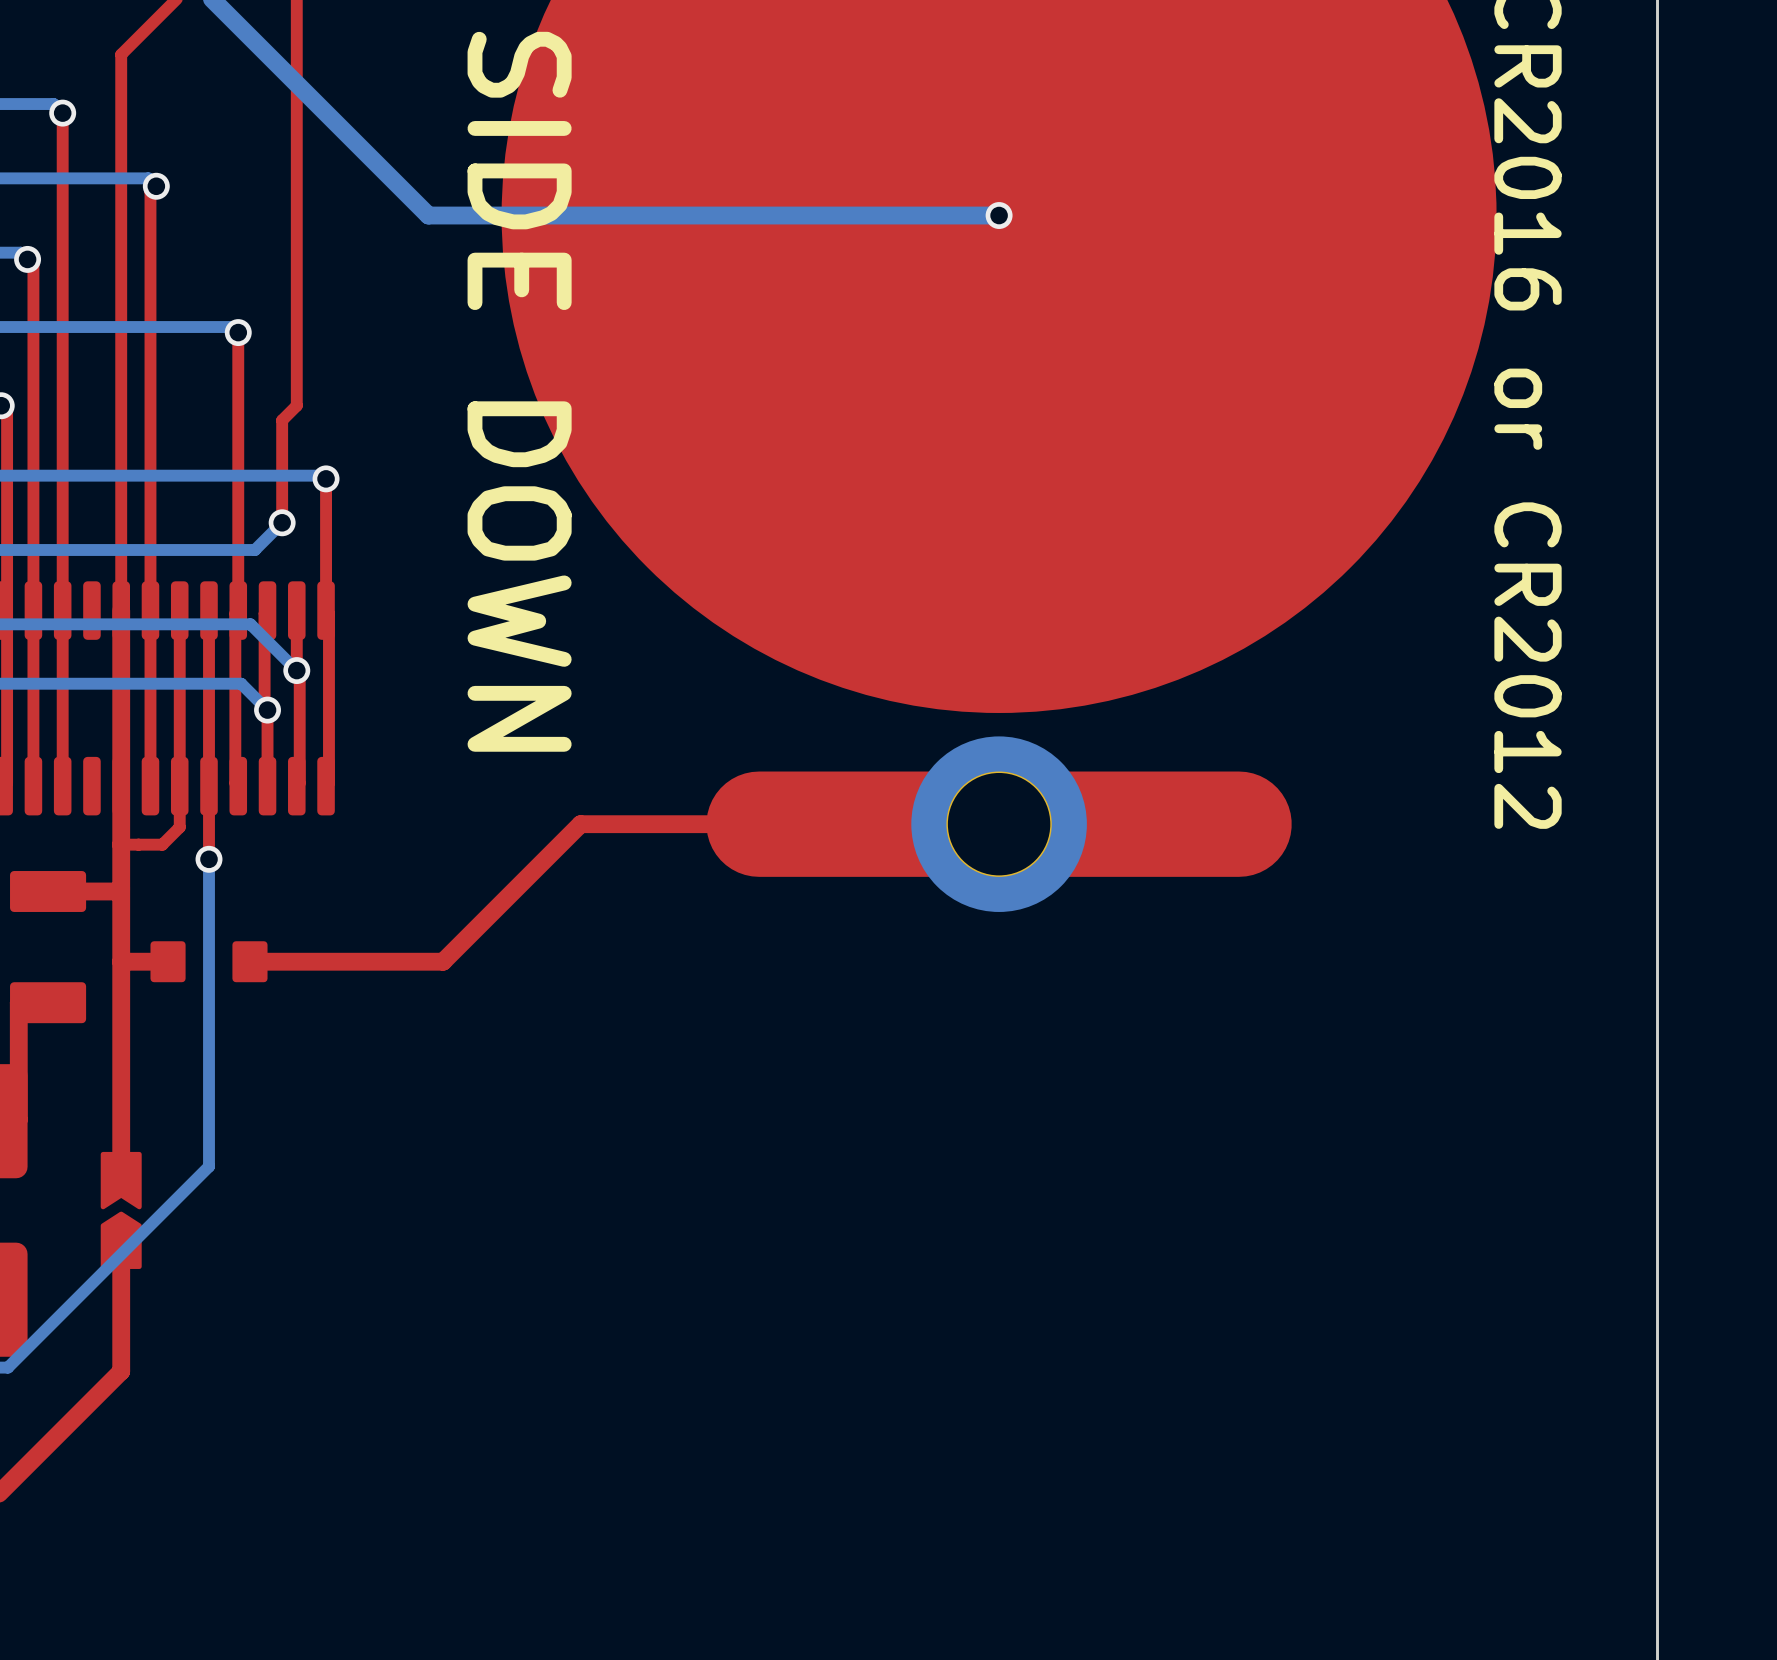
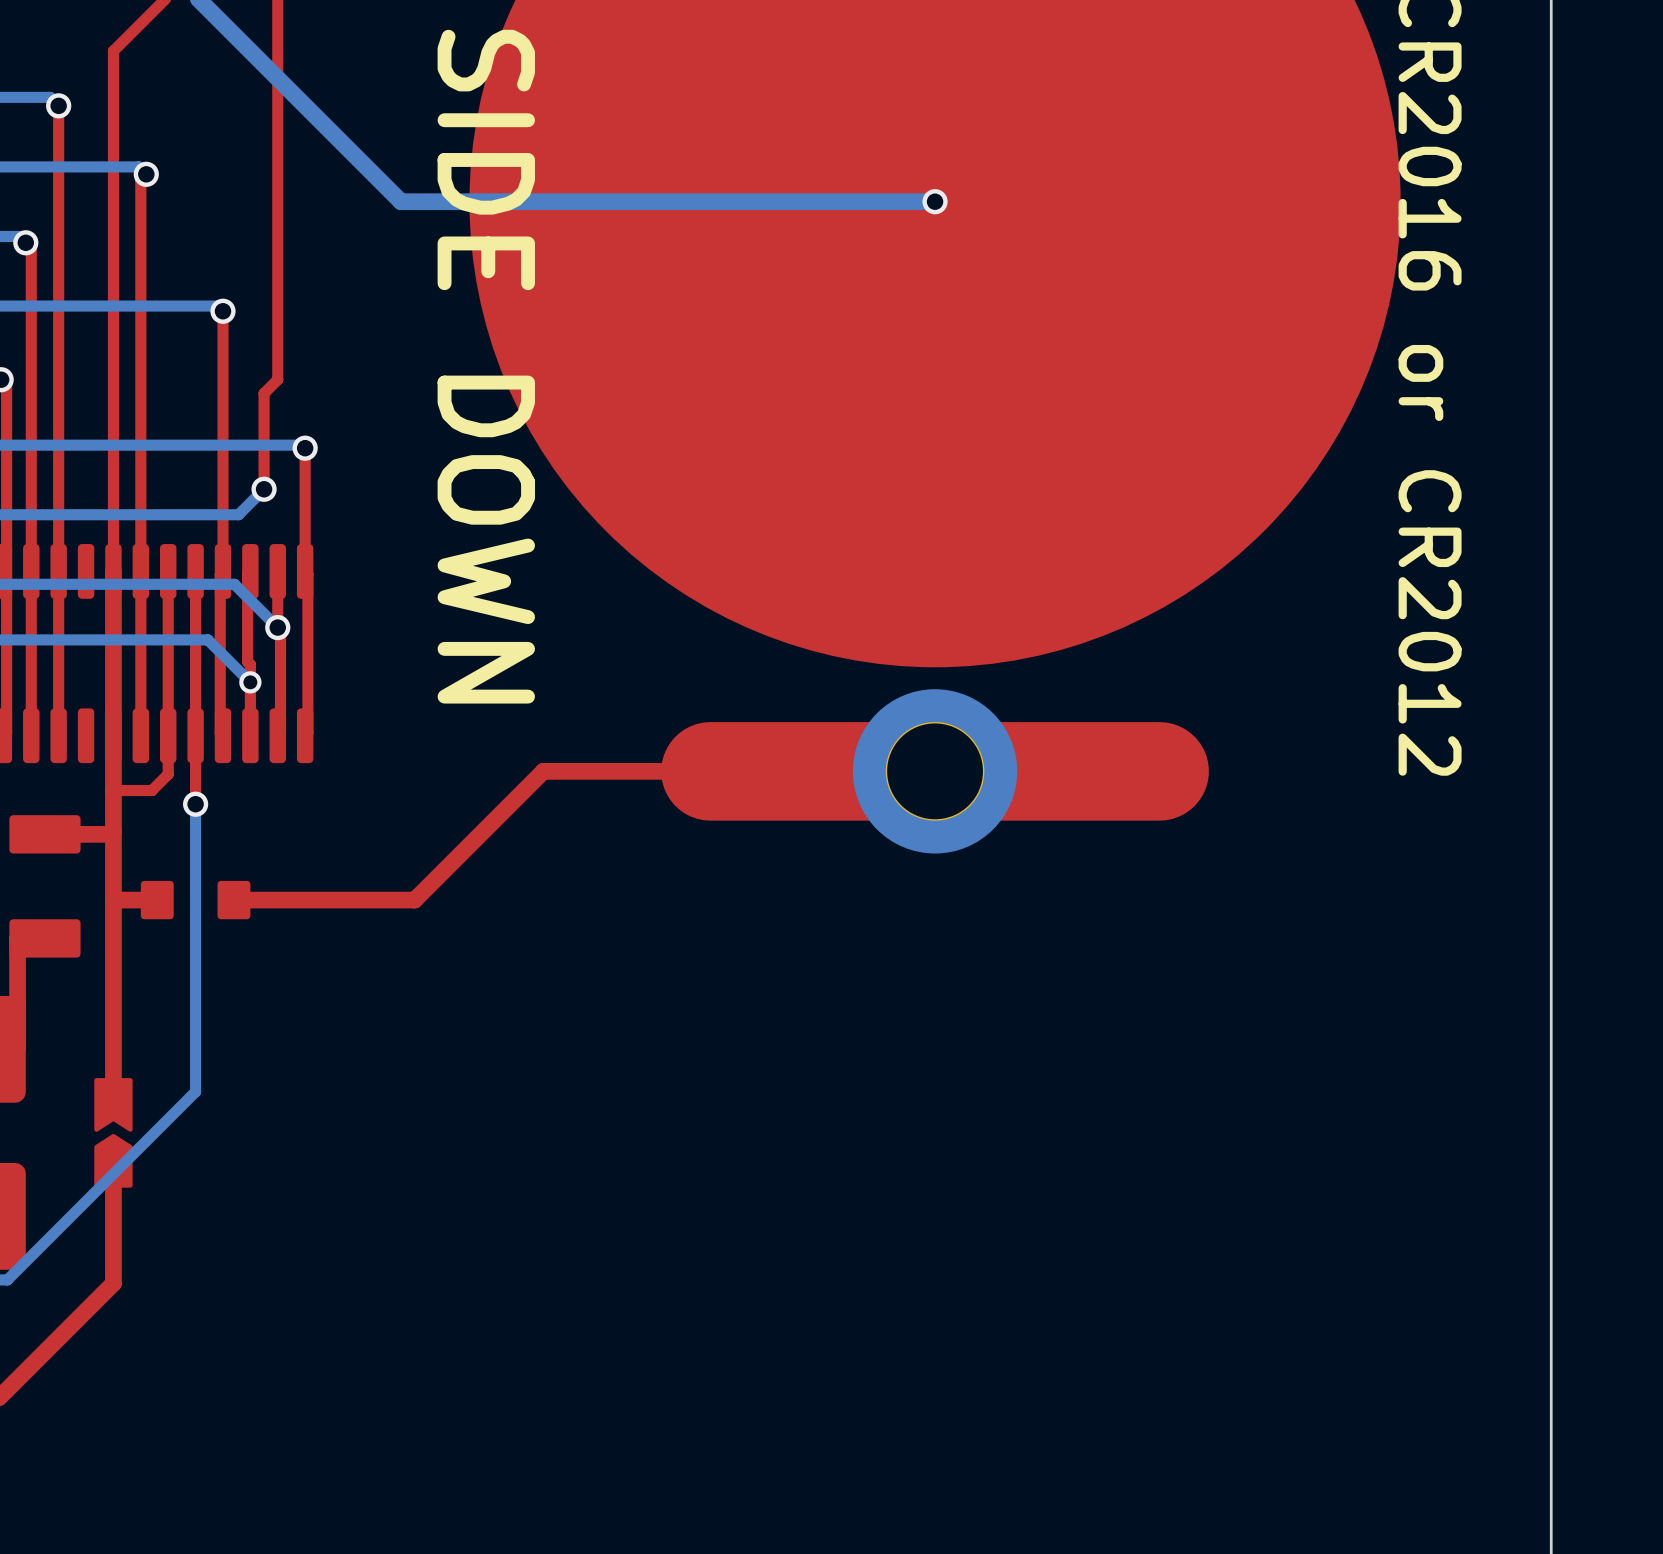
bottom track: (222, 683) (241, 683) (267, 710) -> (207, 639) (250, 682)
via position: (267, 710) -> (250, 682)

